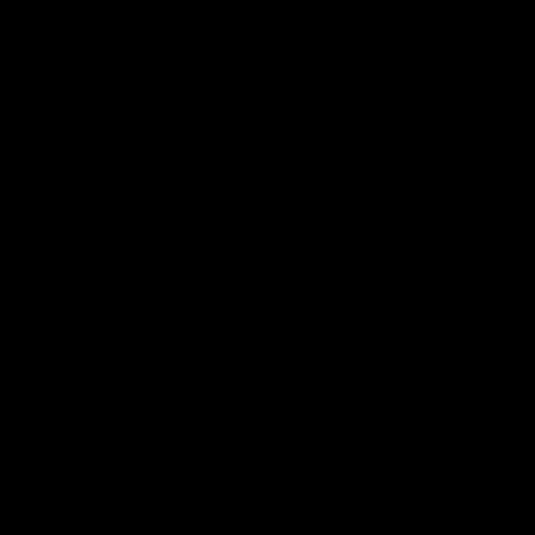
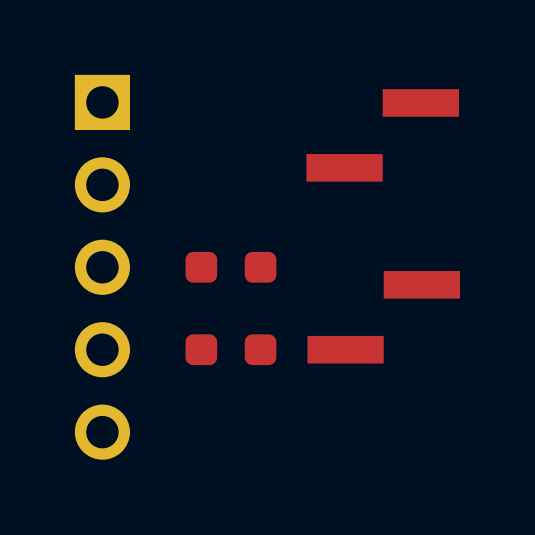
part: none -> (382, 135)
part: none -> (102, 267)
part: none -> (230, 267)
part: none -> (383, 317)
part: none -> (230, 349)

